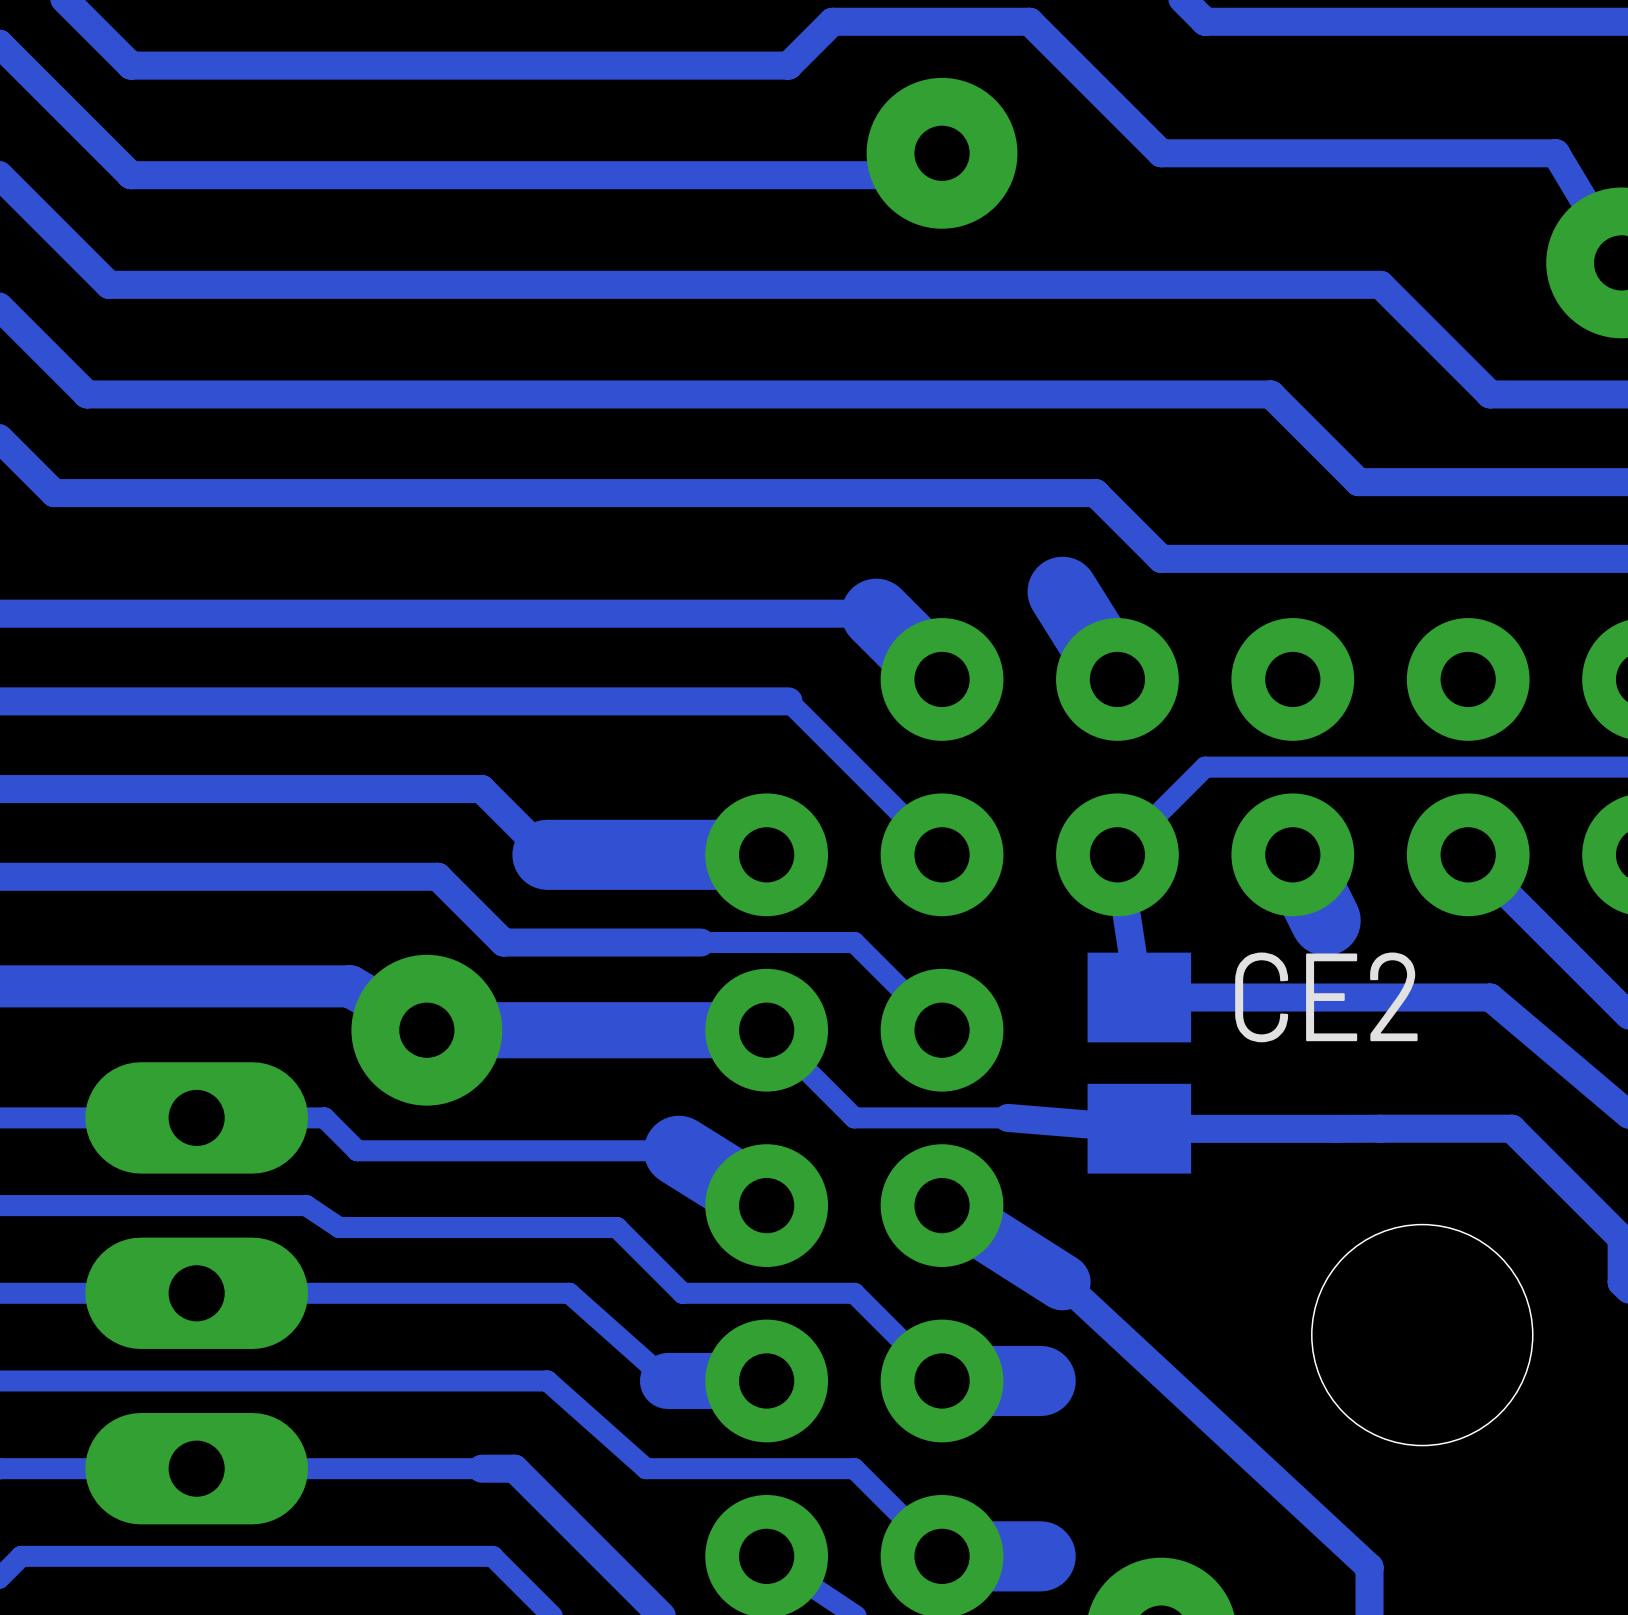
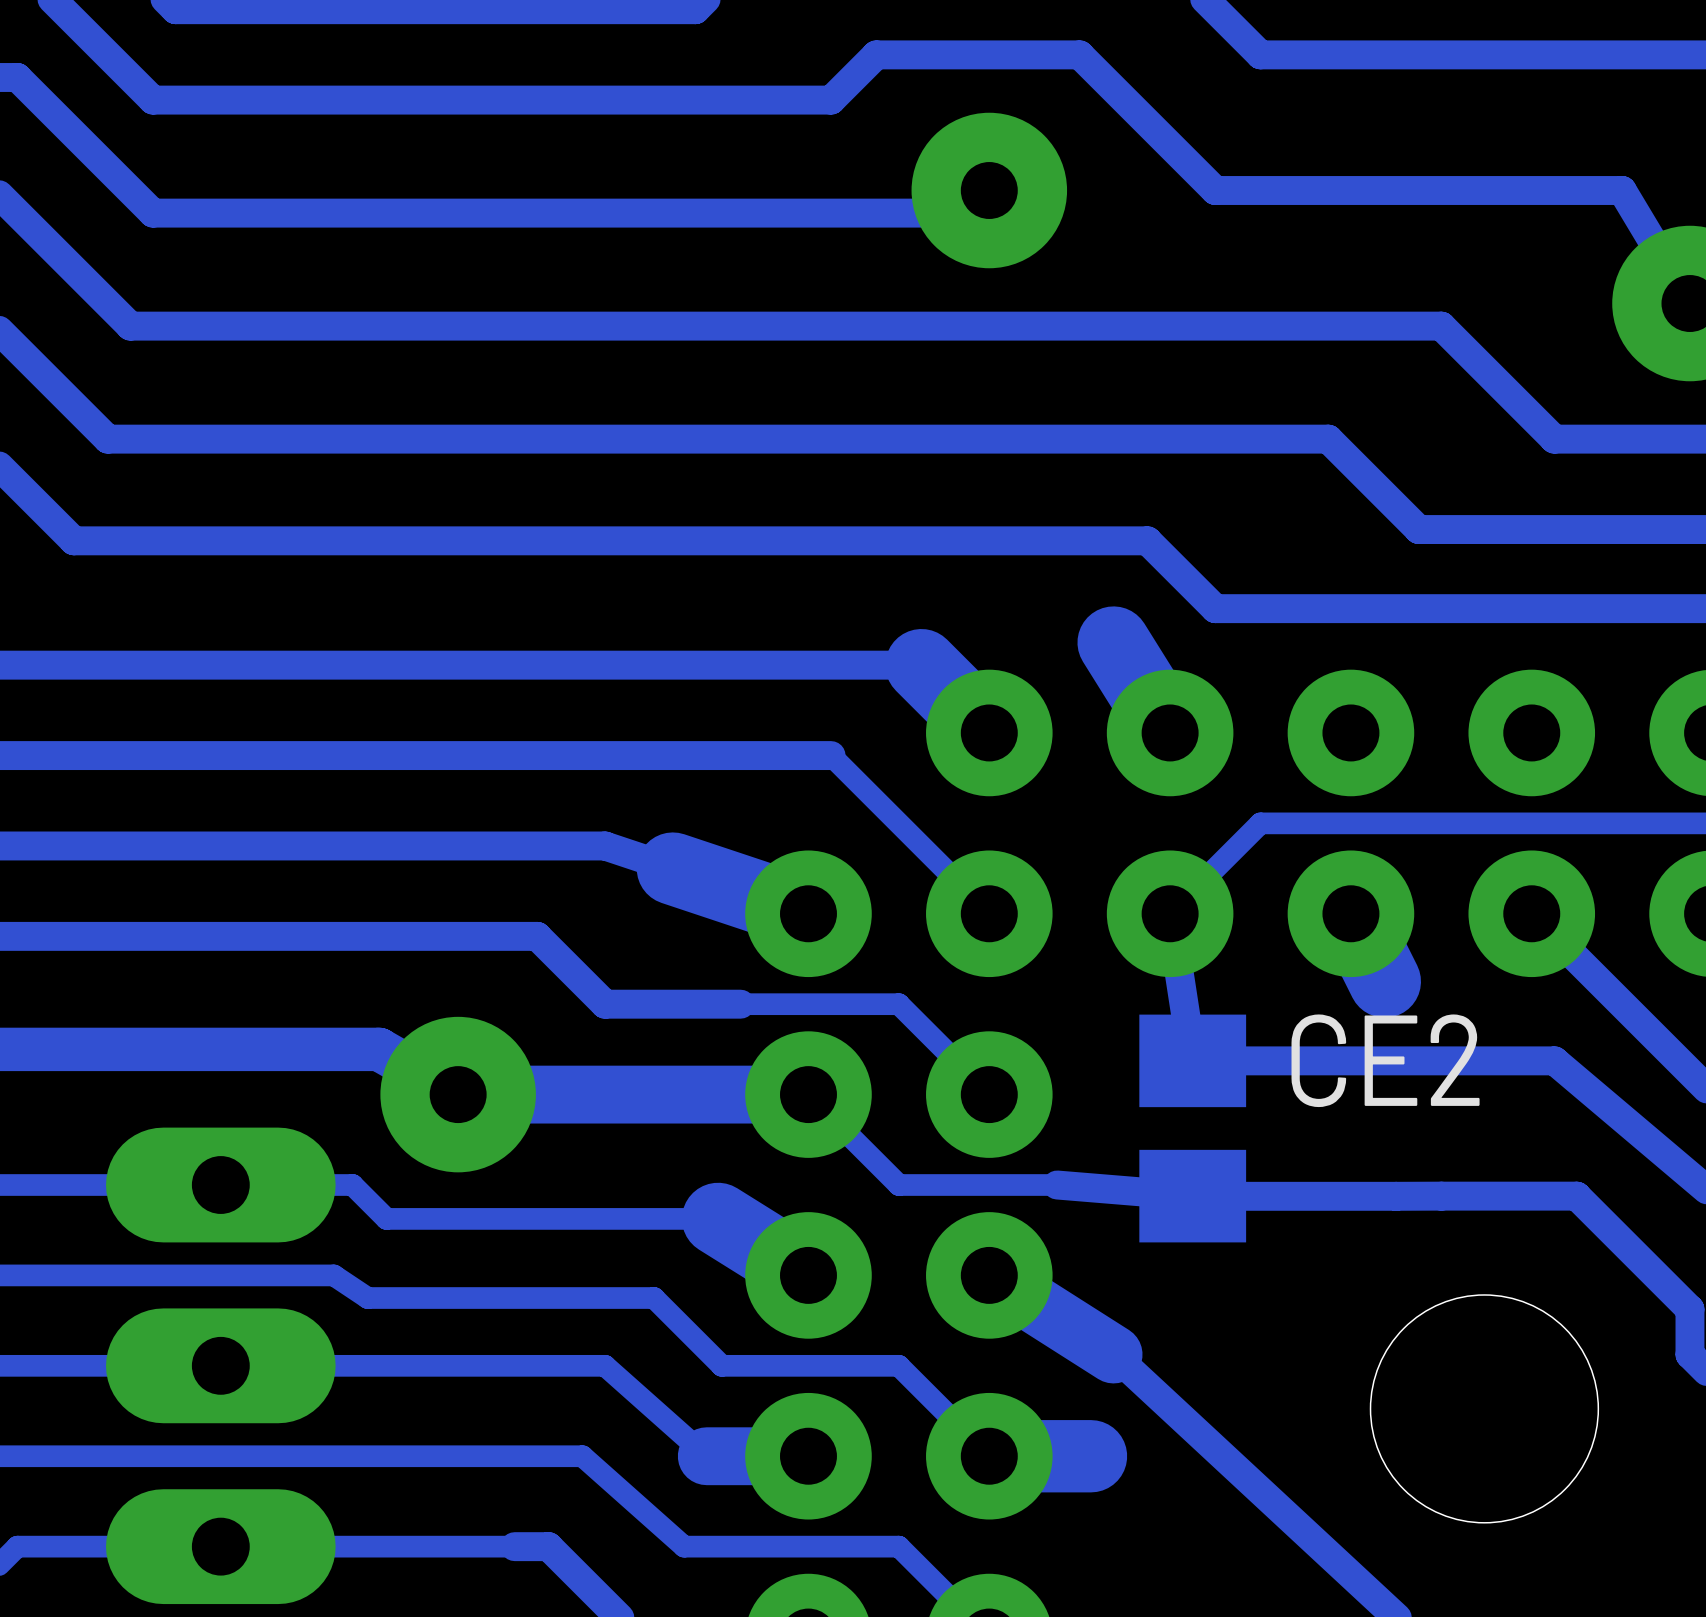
track: (481, 789) (547, 854) (766, 854) -> (514, 845) (605, 845) (808, 913)
track: (437, 876) (503, 942) (569, 942) -> (469, 936) (537, 936) (605, 1004)

